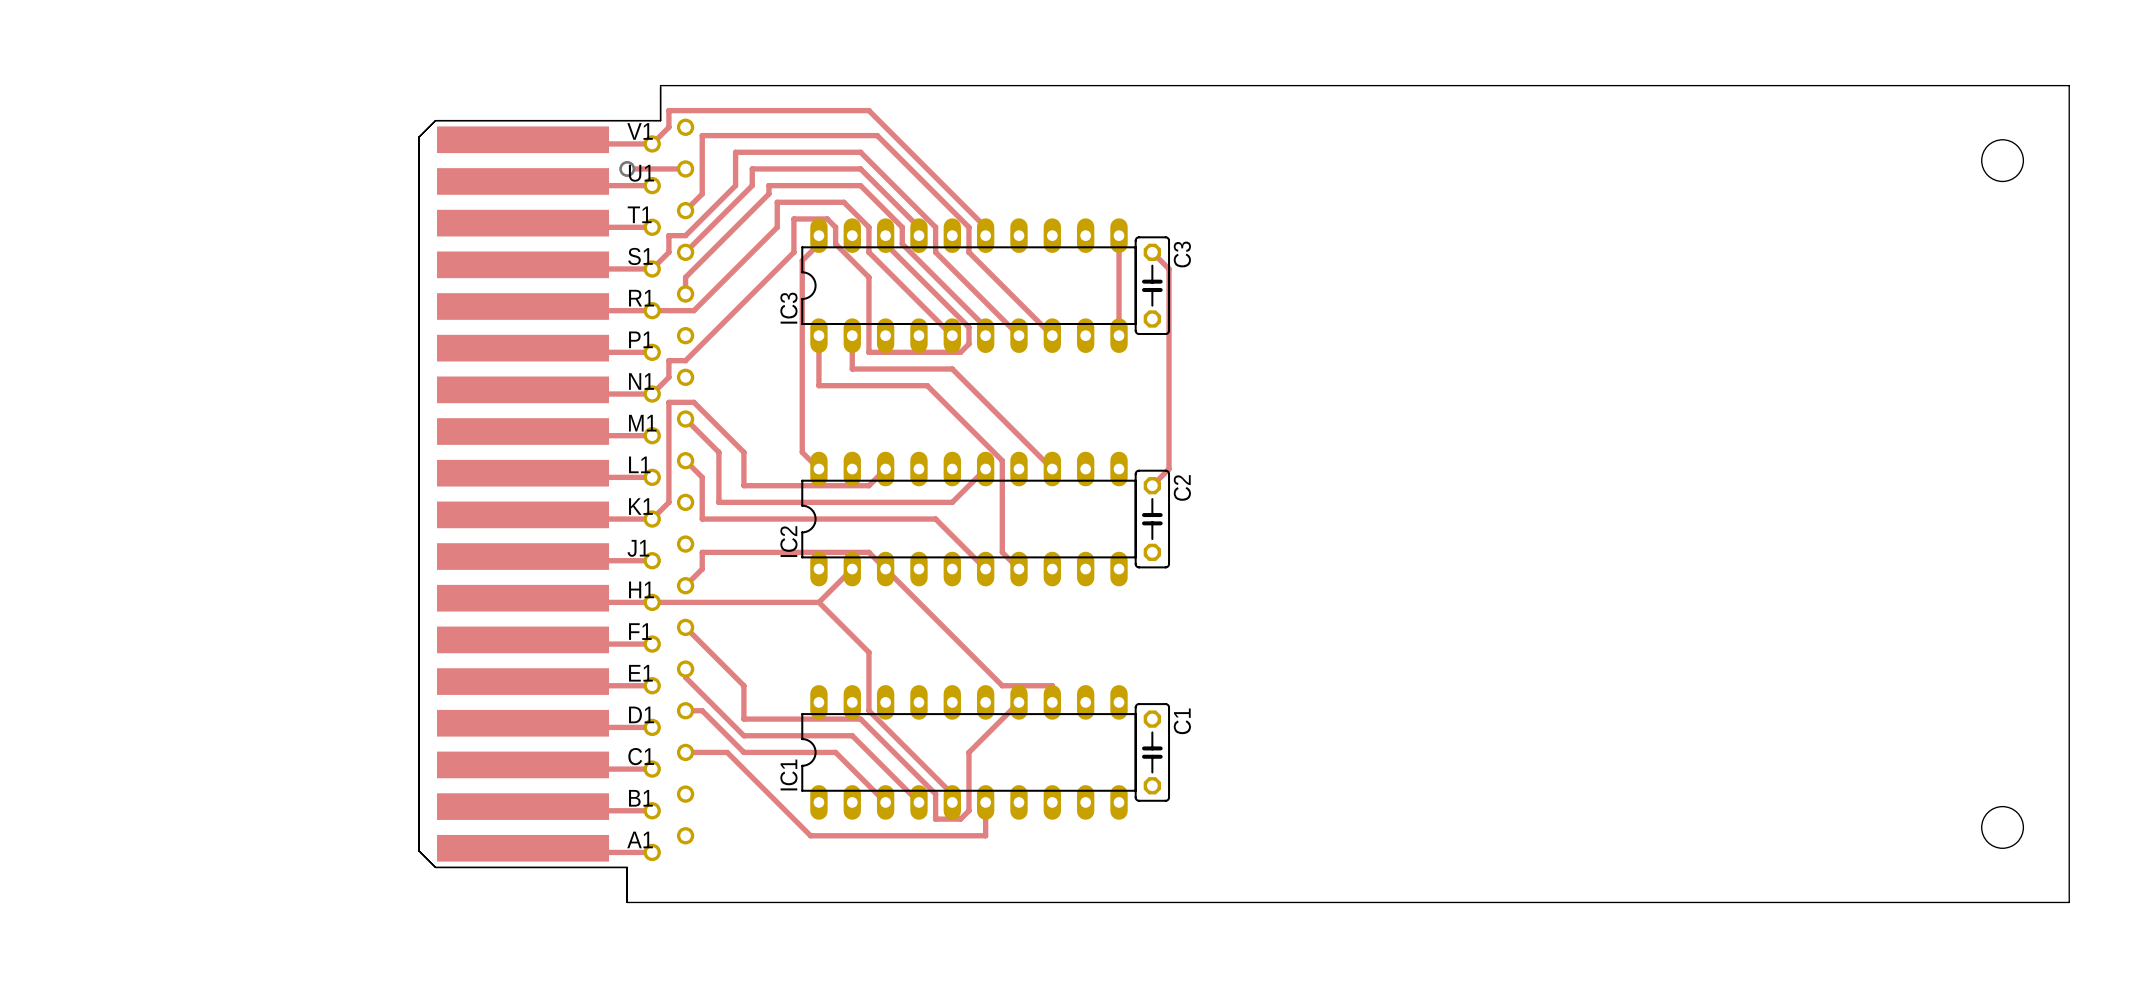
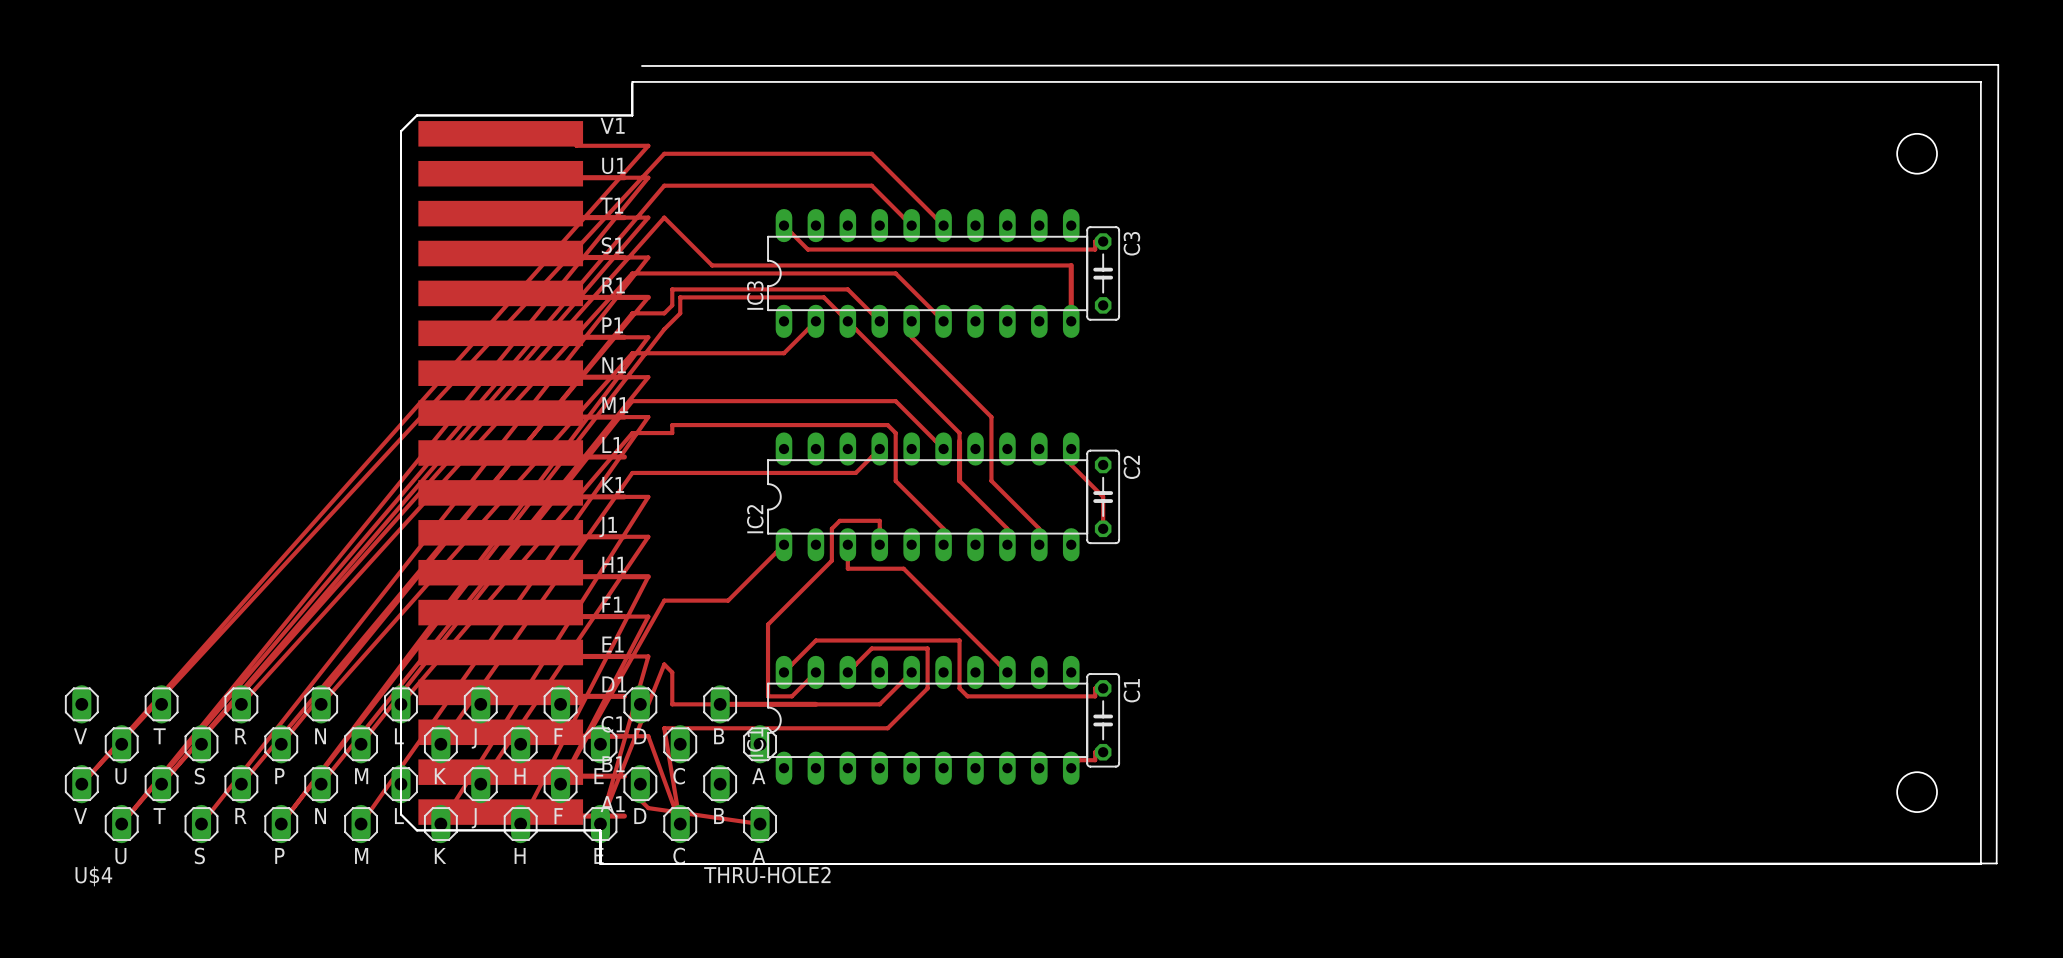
board edge: none -> (641, 65) (1998, 64) (1996, 863) (600, 863)
track: (523, 139) (527, 143) (652, 143) (668, 127) (668, 110) (868, 110) (985, 227) (985, 235) -> (500, 133) (576, 137) (576, 145) (648, 145) (81, 784) (664, 153) (871, 153) (943, 225)
track: (627, 168) (685, 168) -> none
via: (627, 168) -> none
track: none -> (624, 177) (648, 177) (121, 824) (664, 185) (871, 185) (911, 225)
track: (685, 210) (702, 193) (702, 135) (877, 135) (968, 227) (968, 252) (1052, 335) -> none
track: (818, 235) (818, 243) (802, 260) (802, 452) (818, 469) -> (783, 225) (807, 249) (1095, 249) (1095, 241) (1103, 241)
track: (885, 235) (885, 243) (968, 327) (968, 344) (960, 352) (868, 352) (868, 277) (835, 243) (835, 227) (827, 218) (793, 218) (793, 252) (685, 360) (668, 360) (668, 377) (652, 394) -> (321, 784) (648, 377) (624, 377)
track: (918, 235) (918, 227) (860, 168) (752, 168) (752, 185) (685, 252) -> none
track: (1119, 235) (1119, 277) -> (624, 217) (648, 217) (161, 784) (664, 217) (712, 265) (1071, 265)
track: (1152, 252) (1169, 268) (1169, 469) (1152, 485) -> none
track: (652, 268) (668, 252) (668, 235) (685, 235) (735, 185) (735, 152) (860, 152) (935, 227) (935, 252) (1018, 335) -> (624, 257) (648, 257) (201, 824)
track: (685, 293) (685, 277) (768, 193) (768, 185) (860, 185) (902, 227) (902, 243) (985, 327) (985, 335) -> (241, 704) (632, 273) (895, 273) (943, 321)
track: (677, 310) (693, 310) (777, 227) (777, 202) (843, 202) (868, 227) (868, 252) (952, 335) -> (1039, 544) (1039, 528) (991, 480) (991, 417) (911, 337) (911, 321)
track: none -> (648, 297) (241, 784)
track: (818, 335) (818, 385) (927, 385) (1002, 460) -> (624, 337) (648, 337) (281, 824) (664, 329) (680, 313) (680, 297) (823, 297) (959, 433) (959, 441)
track: (852, 335) (852, 369) (952, 369) (1052, 469) -> (815, 321) (783, 353) (632, 353) (321, 704)
track: none -> (879, 321) (847, 289) (672, 289) (672, 305) (664, 313) (632, 313) (281, 744)
track: (685, 419) (718, 452) (718, 502) (952, 502) (985, 469) -> (361, 744) (632, 401) (895, 401) (943, 449)
track: none -> (624, 417) (648, 417) (361, 824)
track: (685, 460) (702, 477) (702, 519) (935, 519) (985, 569) -> (400, 704) (632, 433) (672, 433) (672, 425) (887, 425) (895, 433) (895, 480) (943, 528) (943, 544)
track: (885, 469) (868, 485) (743, 485) (743, 452) (693, 402) (668, 402) (668, 502) (652, 519) -> (440, 824) (648, 496) (624, 496)
track: none -> (879, 449) (855, 472) (632, 472) (440, 744)
track: none -> (1071, 449) (1071, 464) (1103, 496) (1103, 528)
part: (668, 489) -> none
track: (1002, 502) (1002, 552) (1018, 569) -> (959, 480) (1007, 528) (1007, 544)
track: none -> (624, 536) (648, 536) (480, 784)
track: none -> (783, 544) (728, 600) (664, 600) (560, 784) (648, 616) (624, 616)
track: (852, 569) (818, 602) -> none
track: none -> (879, 544) (879, 520) (839, 520) (831, 528) (831, 560) (768, 624) (768, 696) (791, 696) (815, 672)
track: (685, 585) (702, 569) (702, 552) (868, 552) (1002, 685) (1052, 685) (1052, 702) -> (847, 544) (847, 568) (903, 568) (1007, 672)
track: (677, 602) (818, 602) -> (648, 576) (520, 824)
track: (818, 602) (868, 652) (868, 710) (952, 794) (952, 802) -> none
track: (685, 627) (743, 685) (743, 719) (860, 719) (935, 794) (935, 819) (960, 819) (968, 810) (968, 752) (1018, 702) -> none
track: (685, 669) (685, 677) (743, 735) -> (624, 656) (648, 656) (600, 824) (664, 664) (672, 672) (672, 704) (712, 704)
track: none -> (783, 672) (815, 640) (959, 640) (959, 688) (967, 696) (1095, 696) (1095, 688) (1103, 688)
track: none -> (847, 672) (871, 648) (927, 648) (927, 688) (887, 728) (664, 728) (680, 824) (648, 736) (624, 736)
track: (685, 710) (702, 710) (743, 752) (835, 752) (885, 802) -> none
track: (852, 735) (918, 802) -> (815, 704) (879, 704) (911, 672)
track: (685, 752) (727, 752) (810, 835) (985, 835) (985, 802) -> none
track: none -> (1103, 752) (1095, 752) (1095, 760) (1079, 760) (1071, 768)
U$4: none -> THRU-HOLE2 (420, 764)
track: none -> (640, 784) (640, 800) (648, 808) (760, 824)

